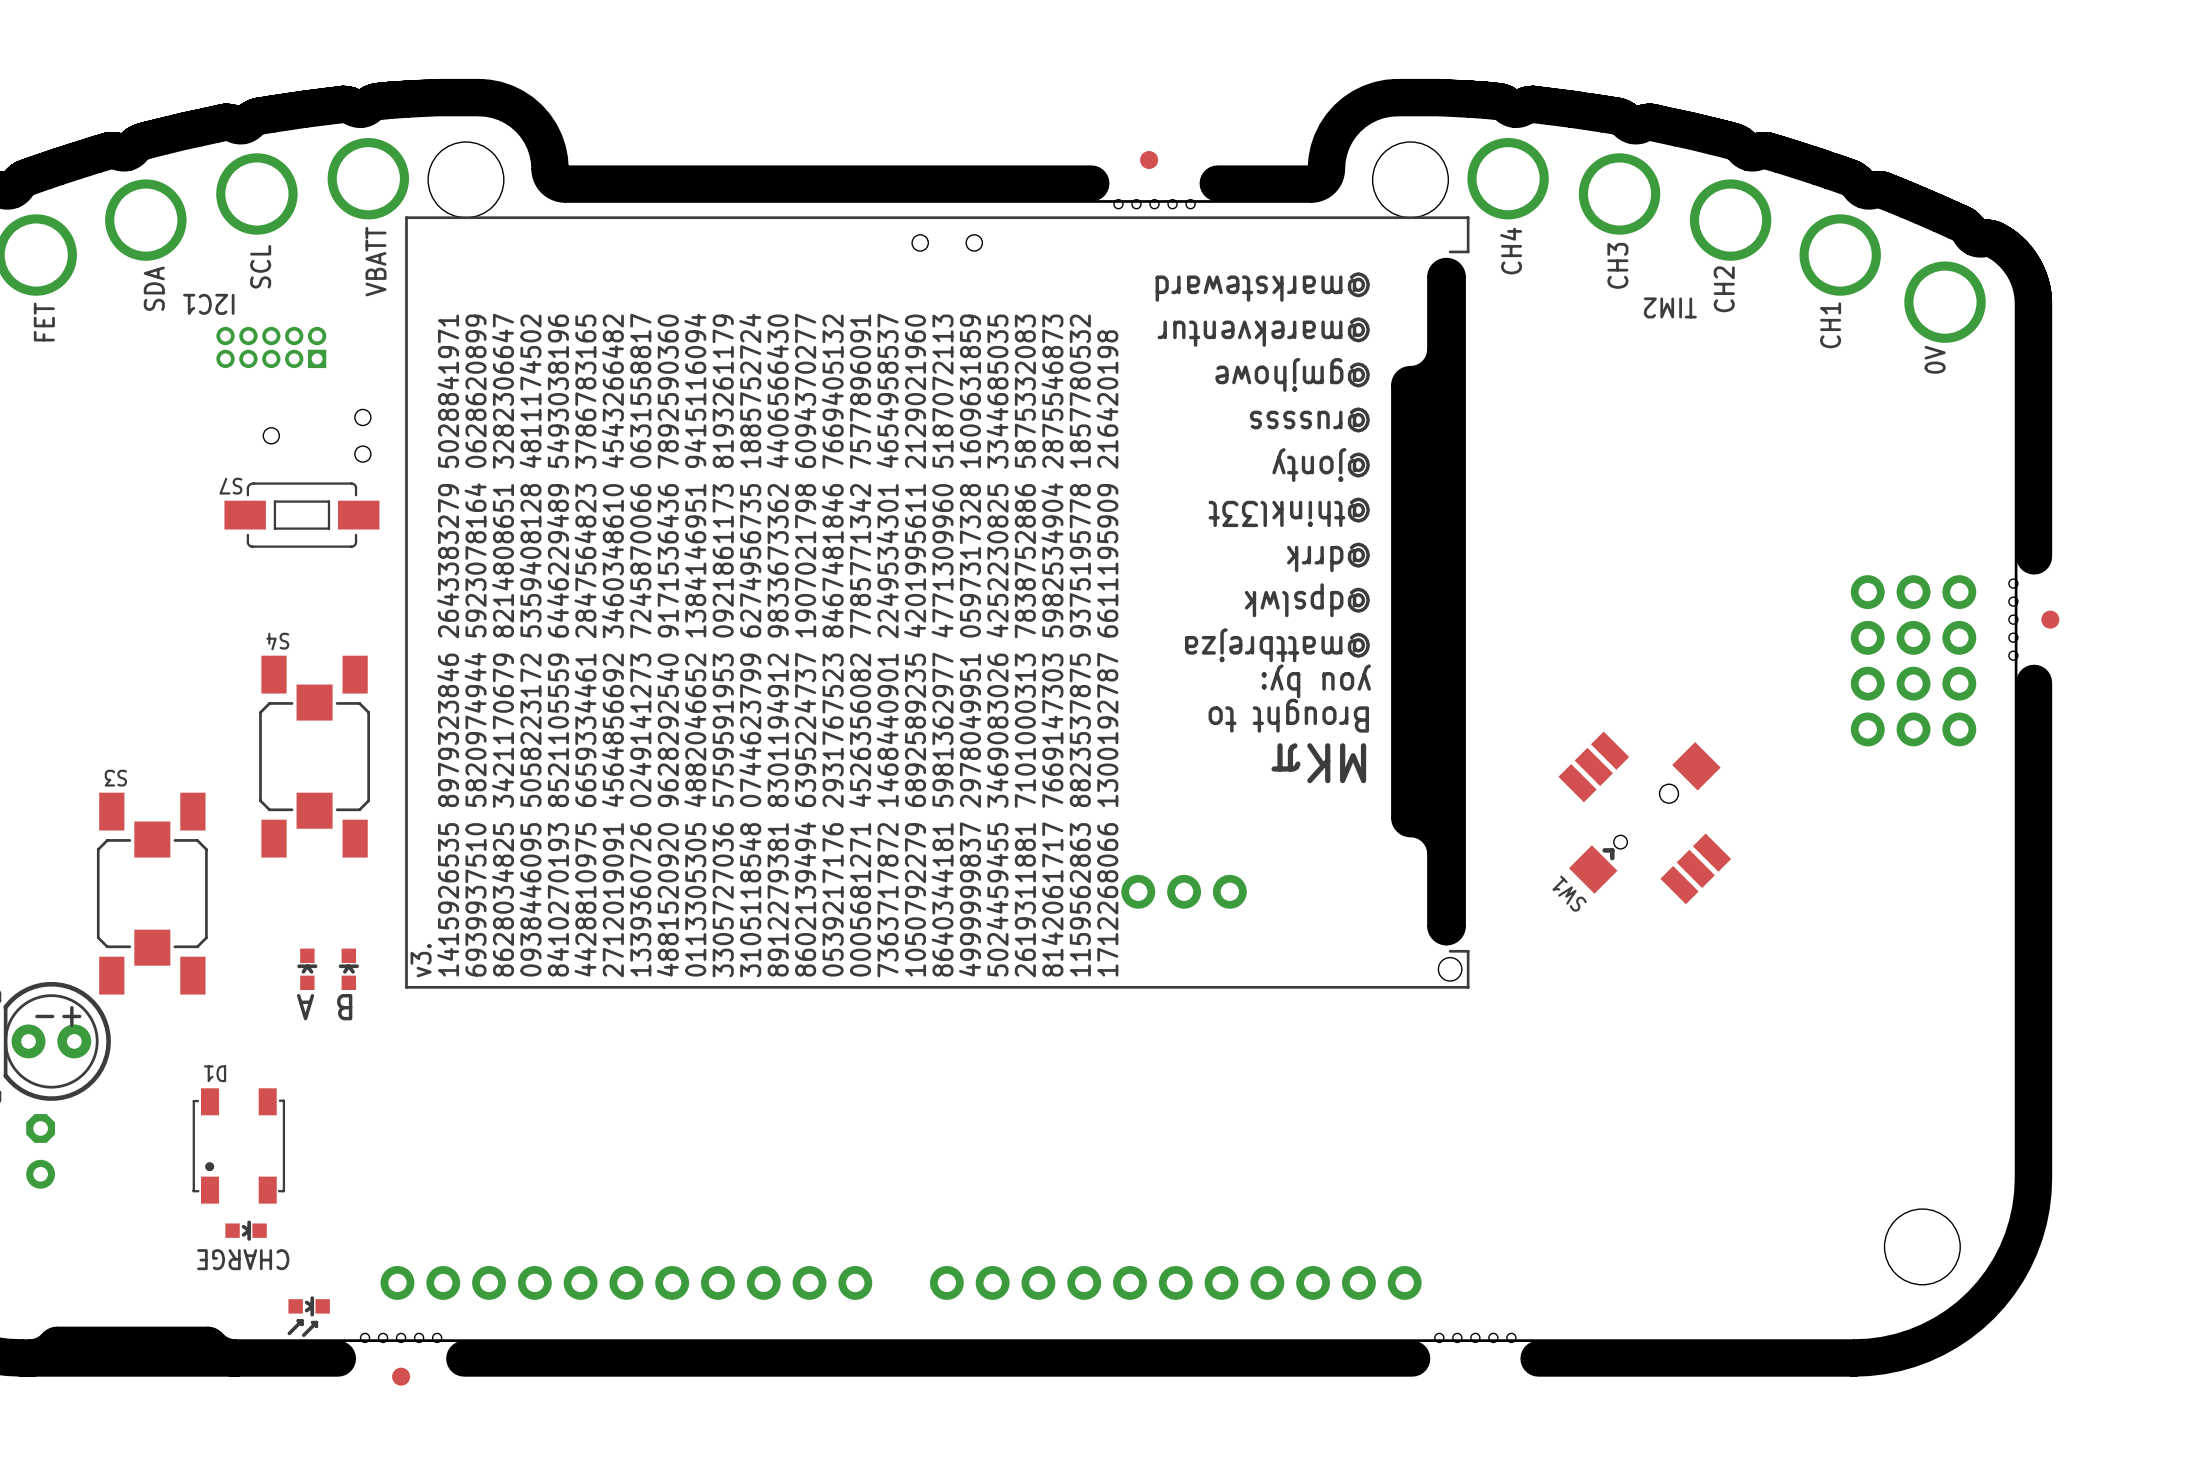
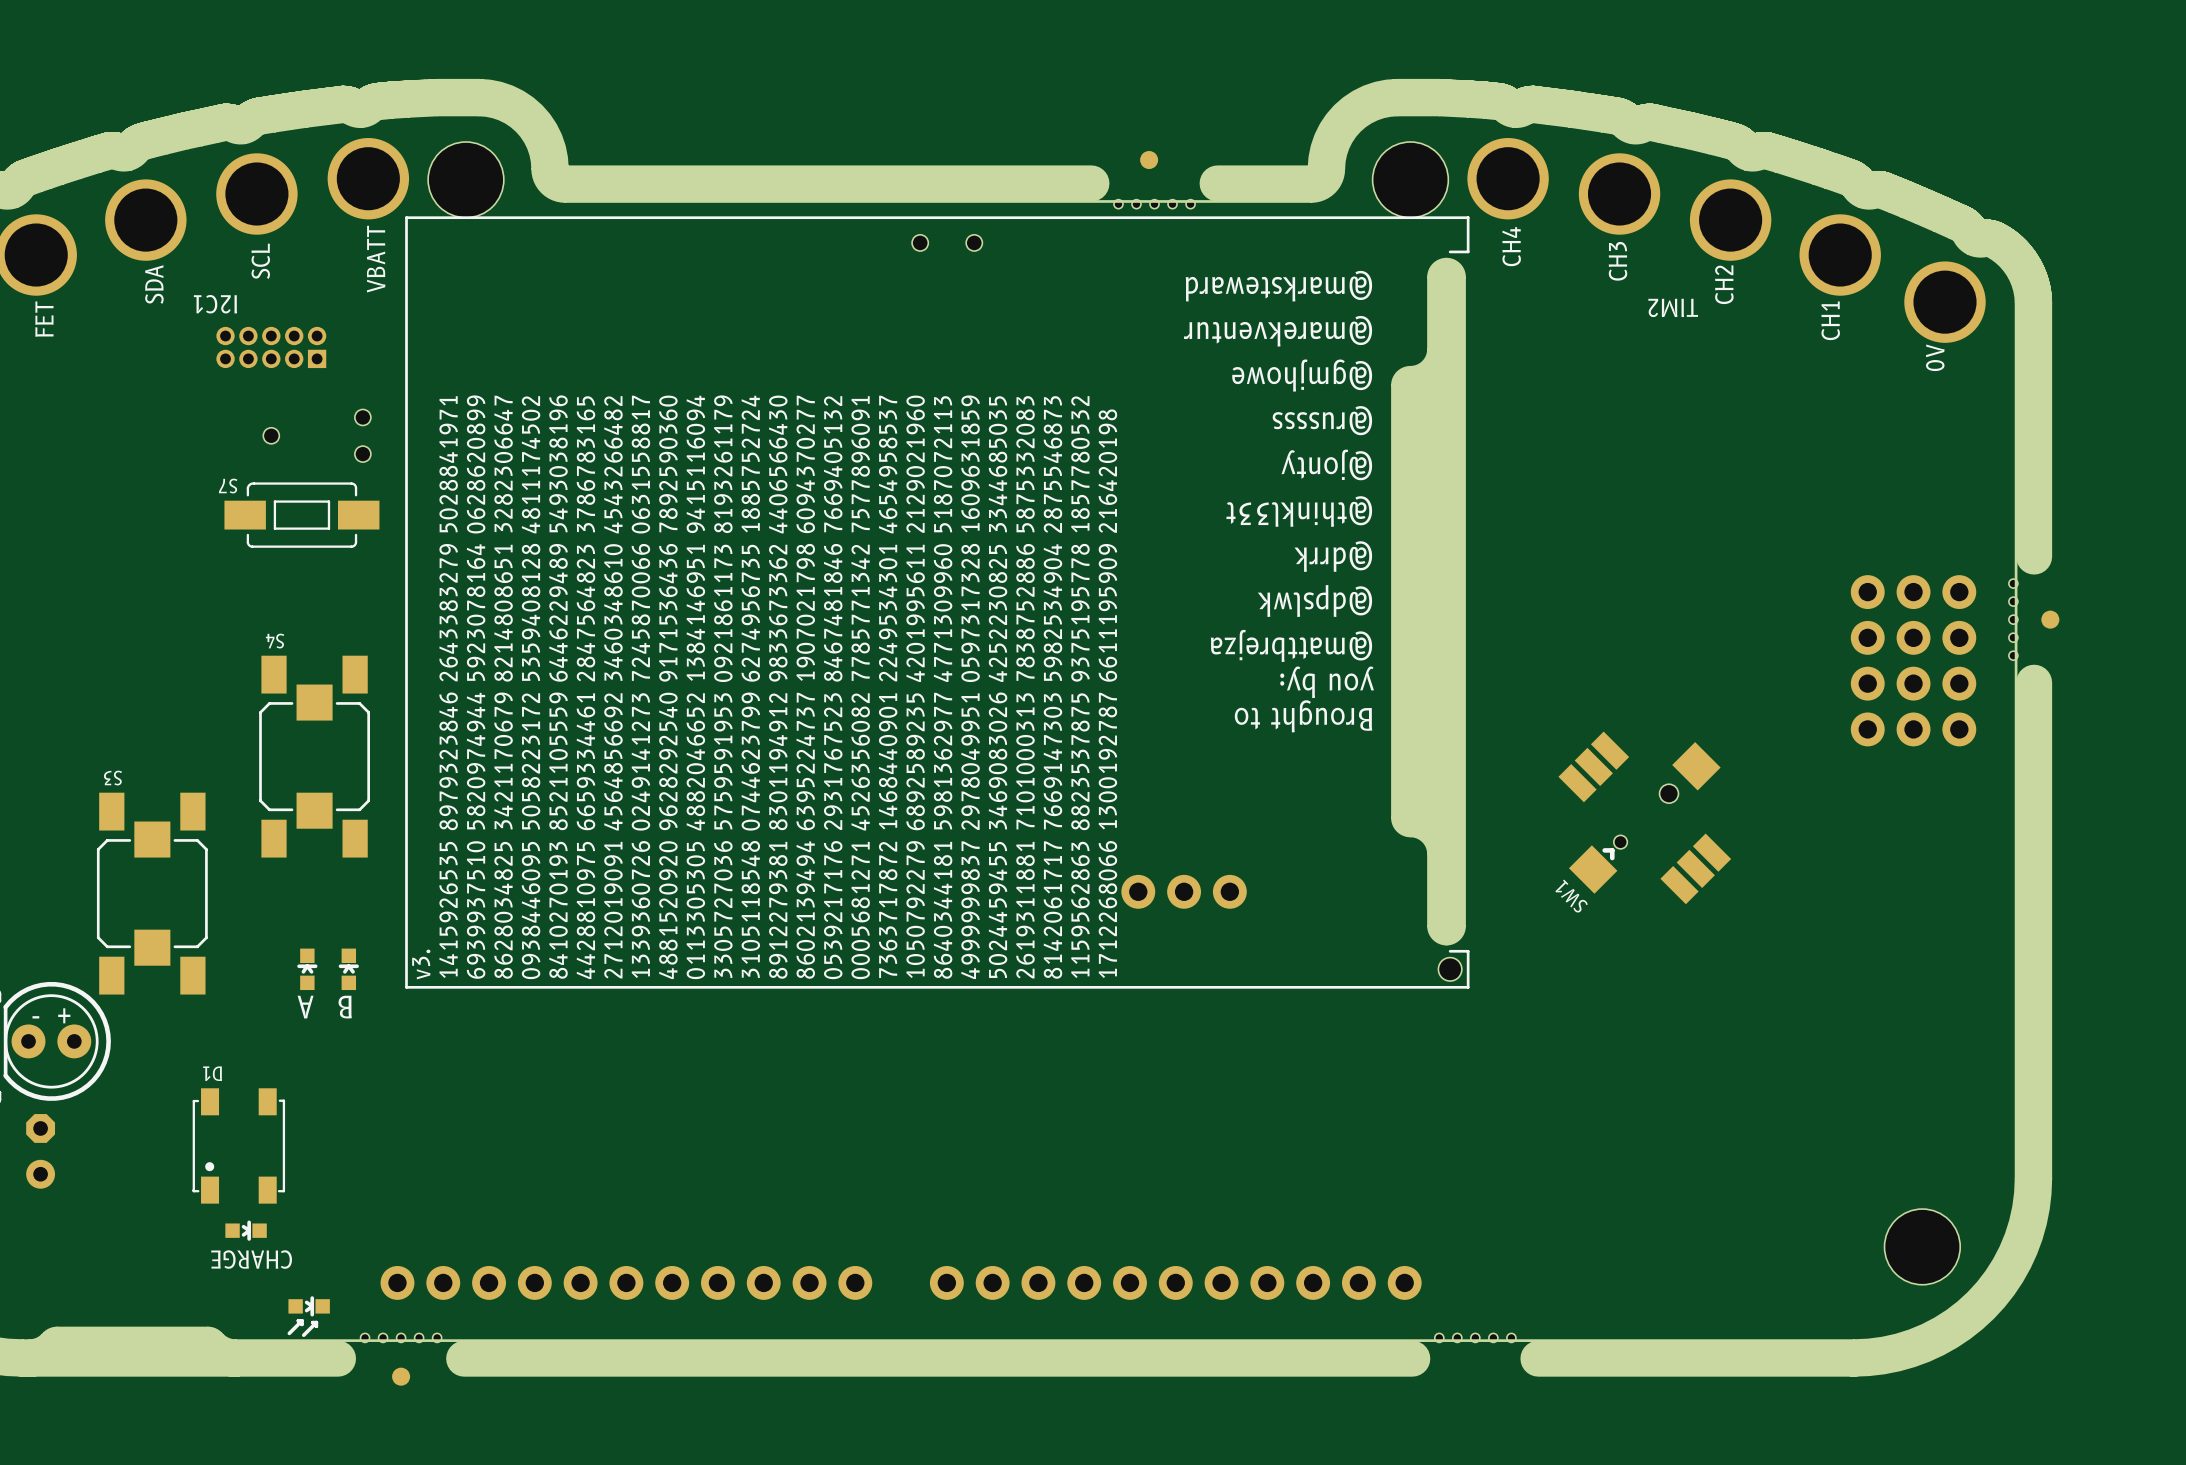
text: MKπ (1318, 763) -> none

